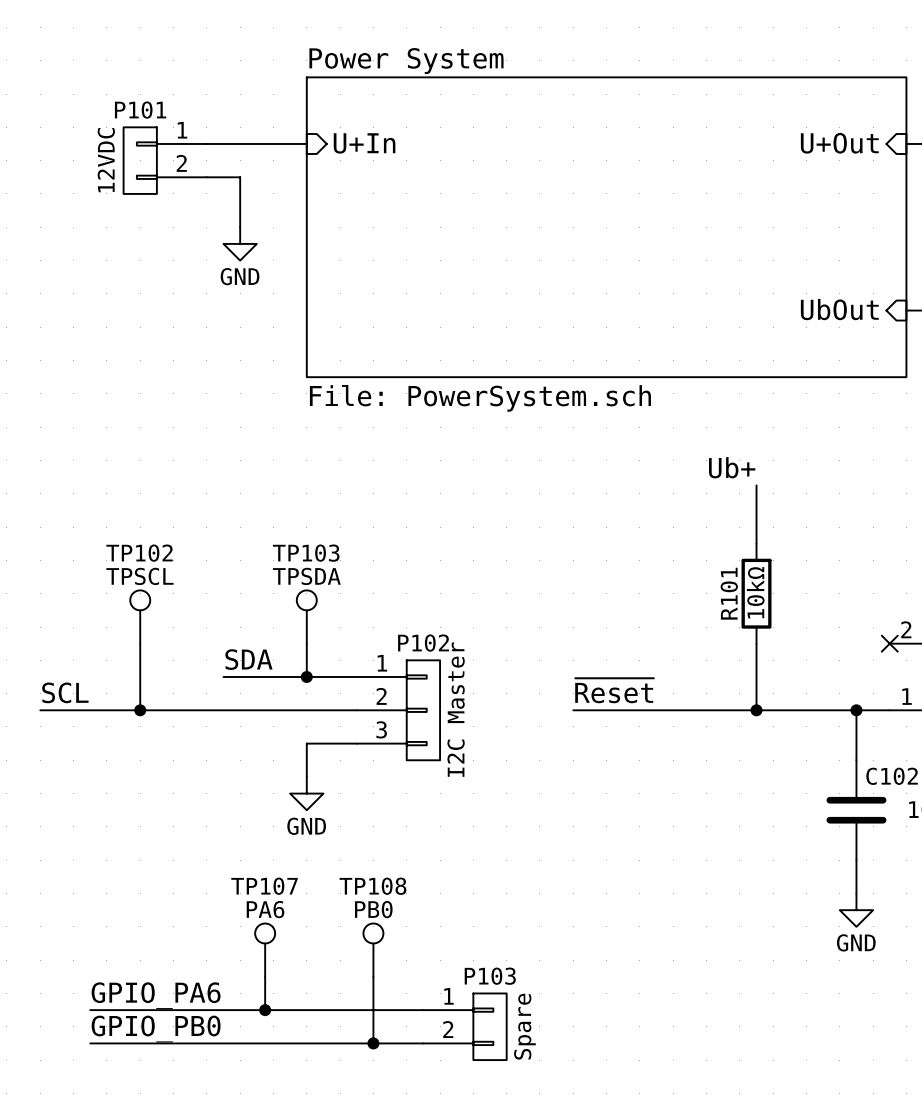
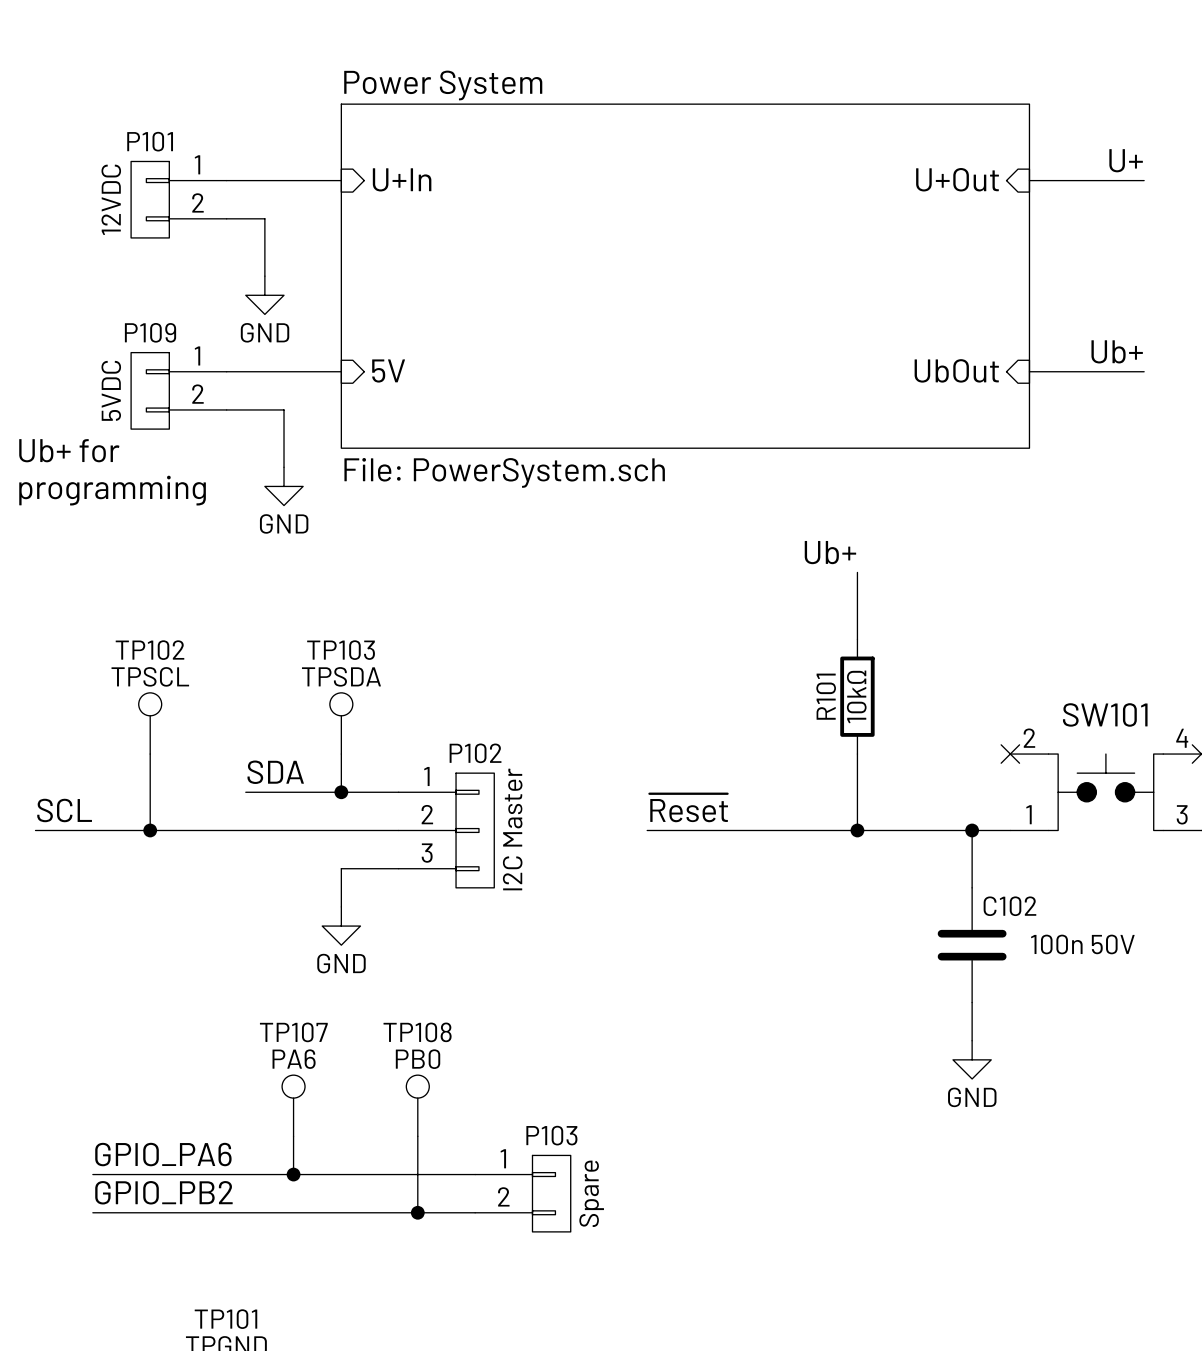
wire: none -> (226, 371) (341, 371)
sheet pin: none -> 5V (388, 371)
P109: none -> 5VDC (178, 390)
wire: none -> (226, 409) (284, 409) (284, 467)
text: none -> Ub+ for (69, 450)
power symbol: none -> GND (284, 486)
text: none -> programming (112, 490)
label: GPIO_PB0 (156, 1029) -> GPIO_PB2 (163, 1192)

